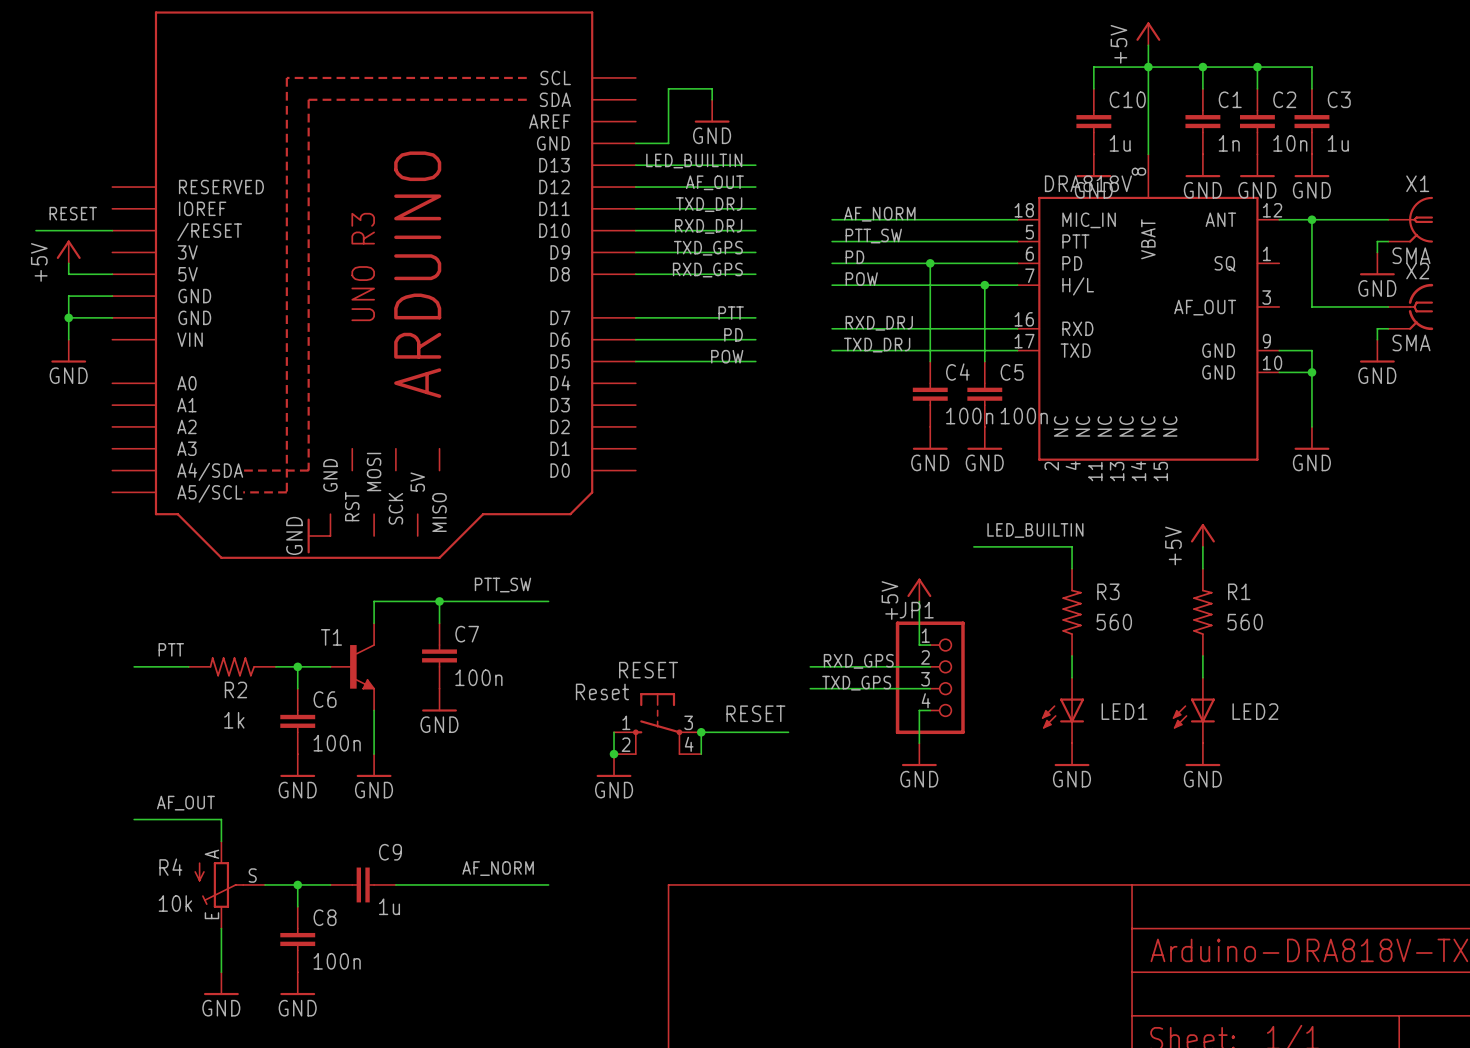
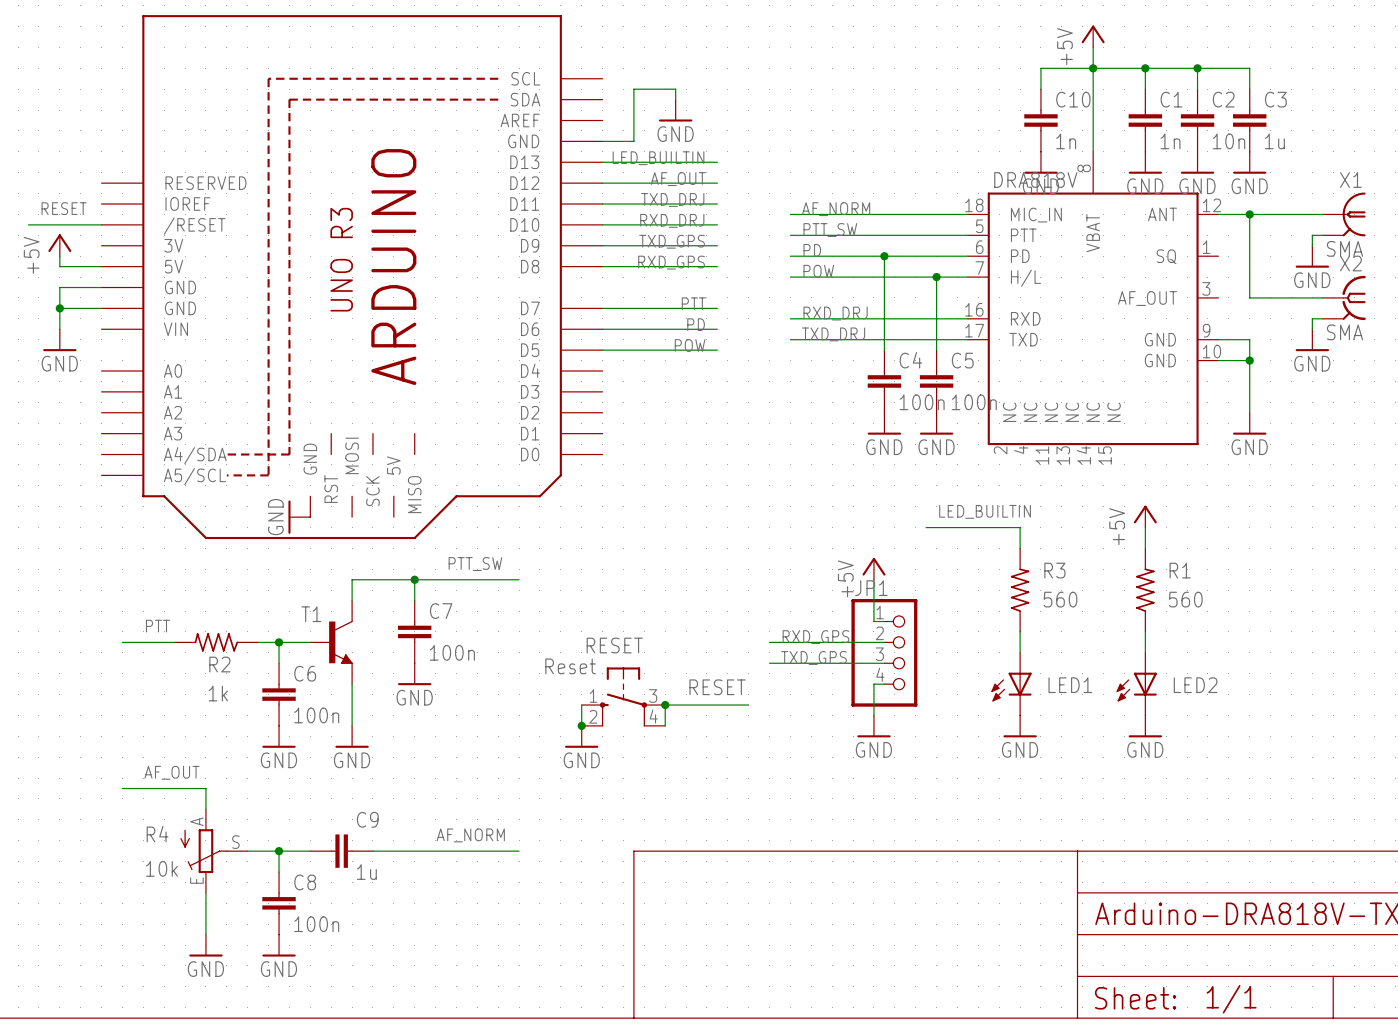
C10 value: 1u (1120, 143) -> 1n (1066, 141)

